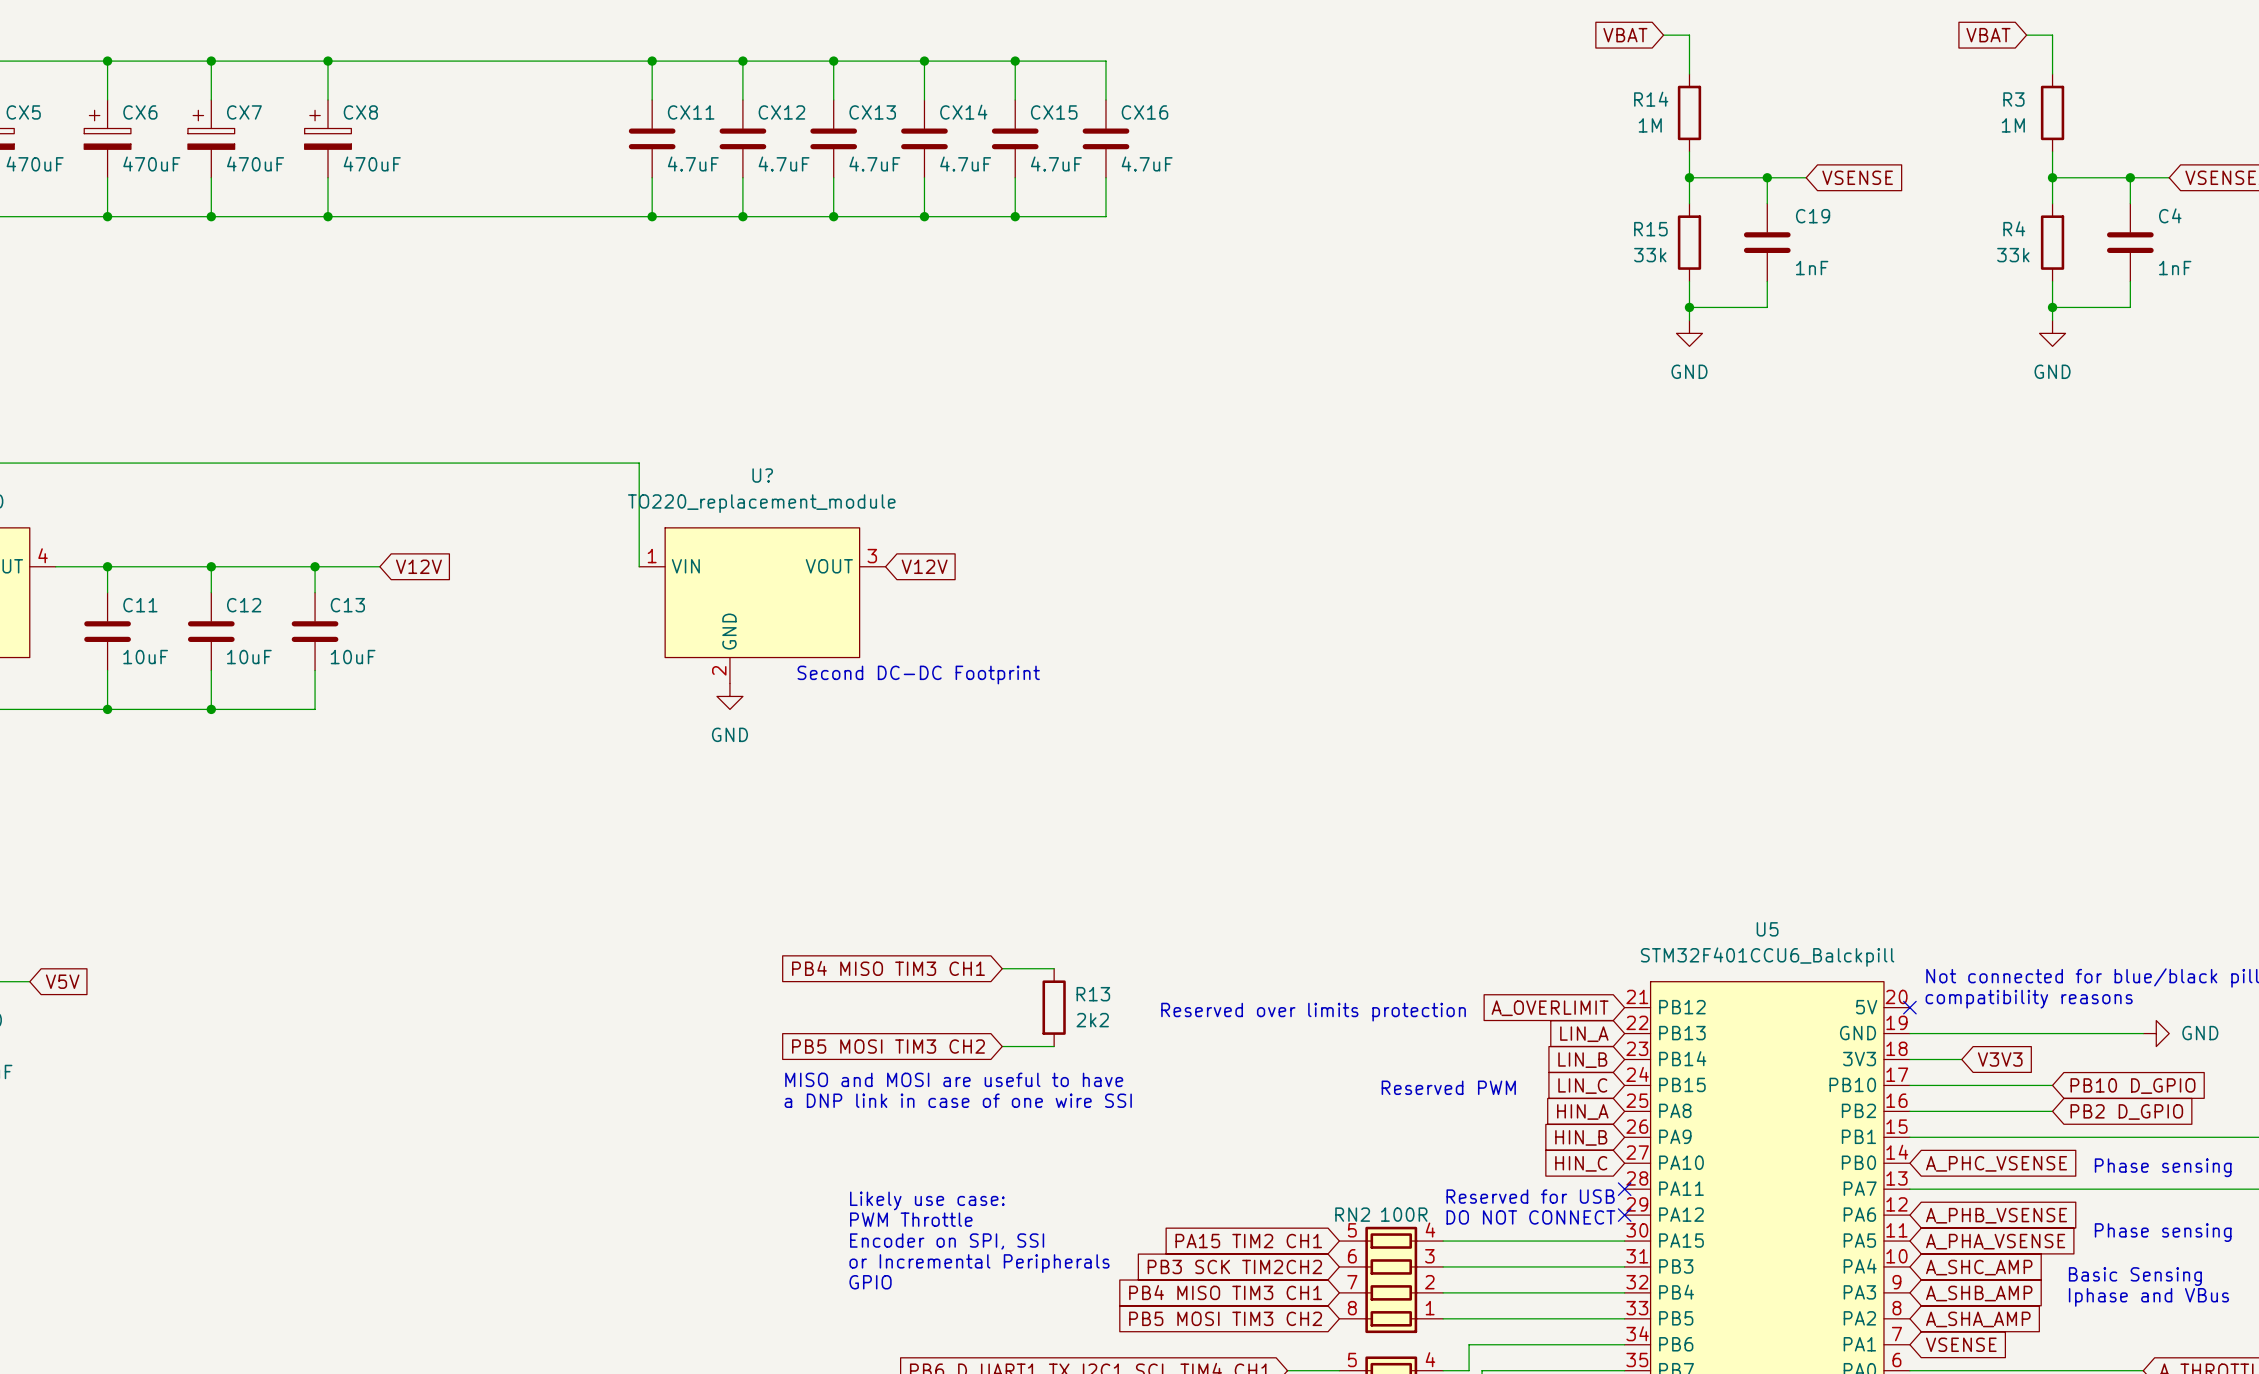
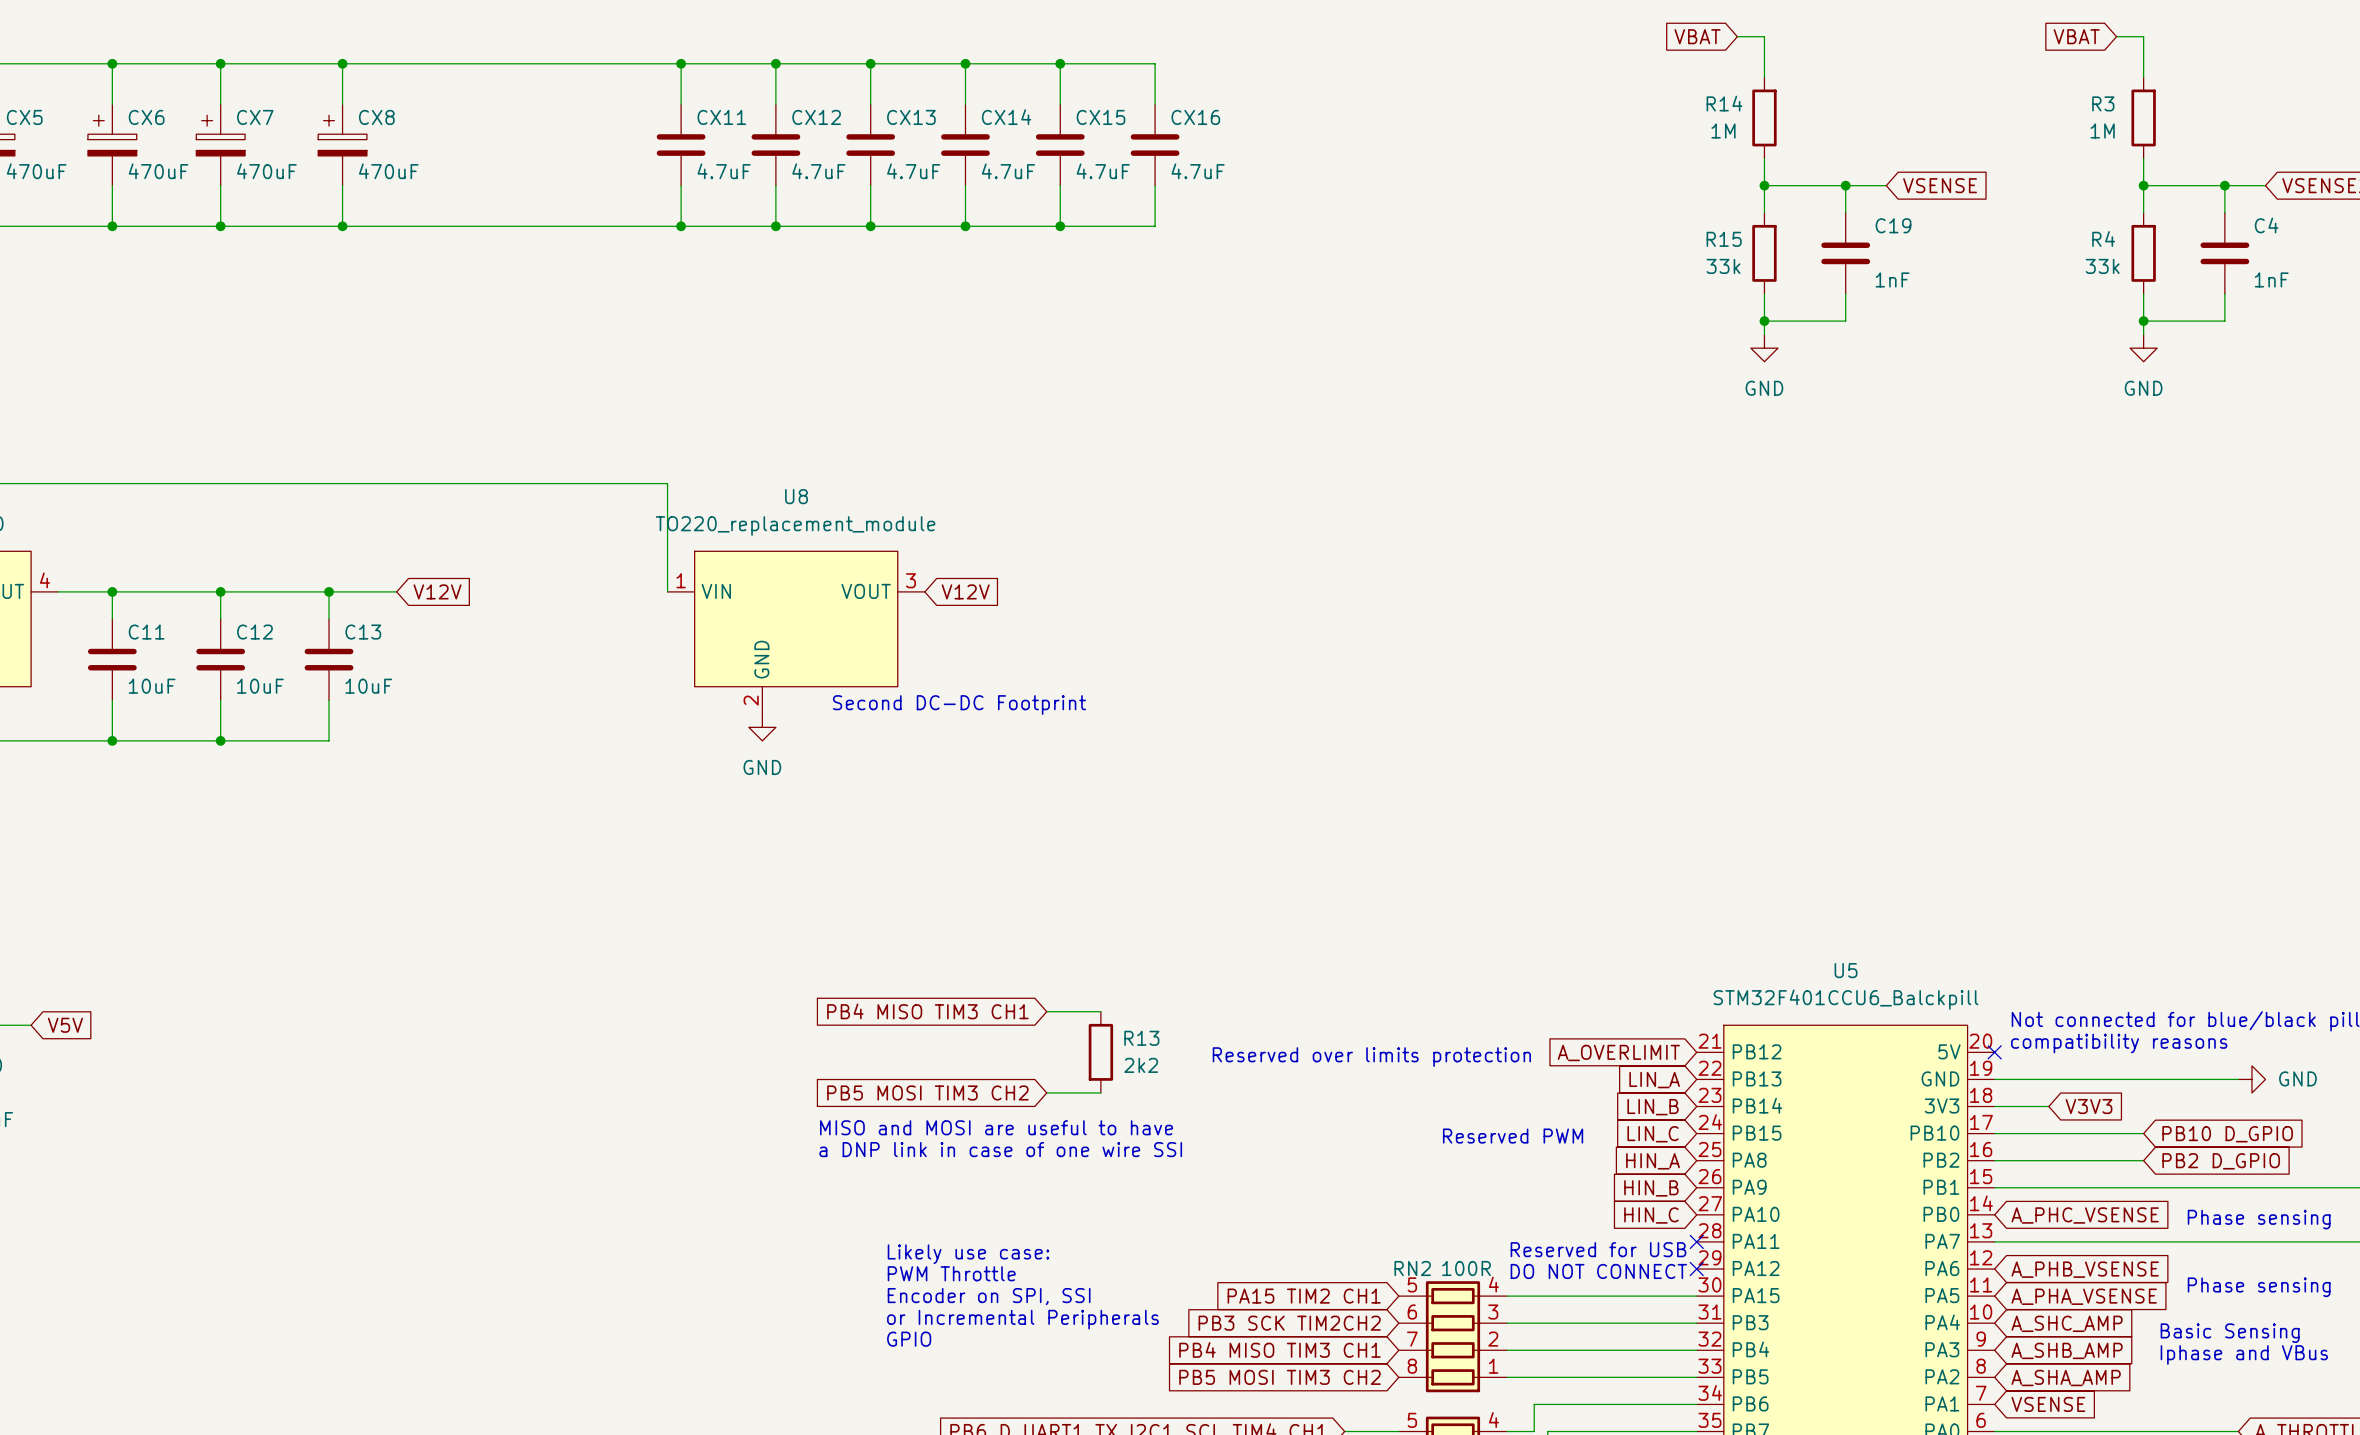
U? name: U? (762, 475) -> U8 (796, 496)

